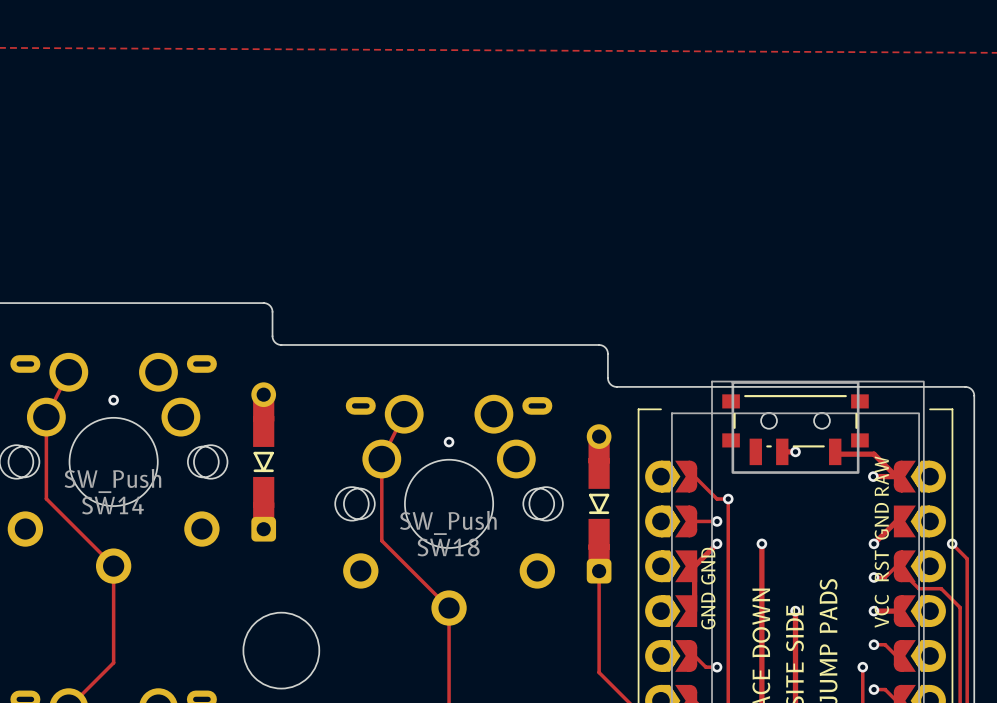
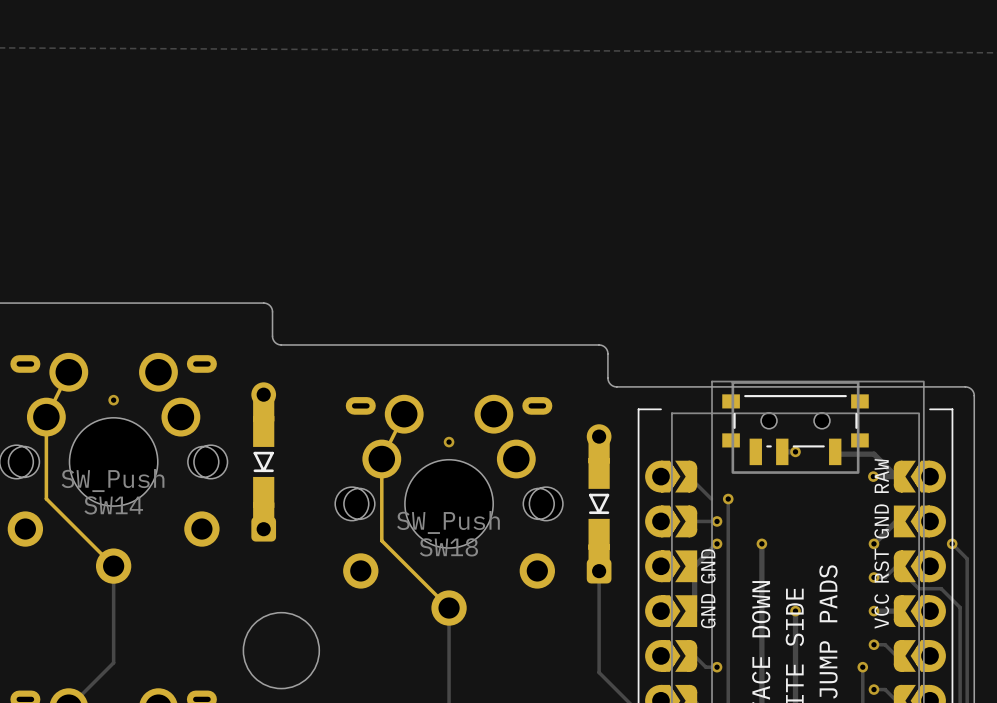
track: (694, 476) (717, 499) (728, 499) -> (694, 476) (694, 482) (711, 499)

